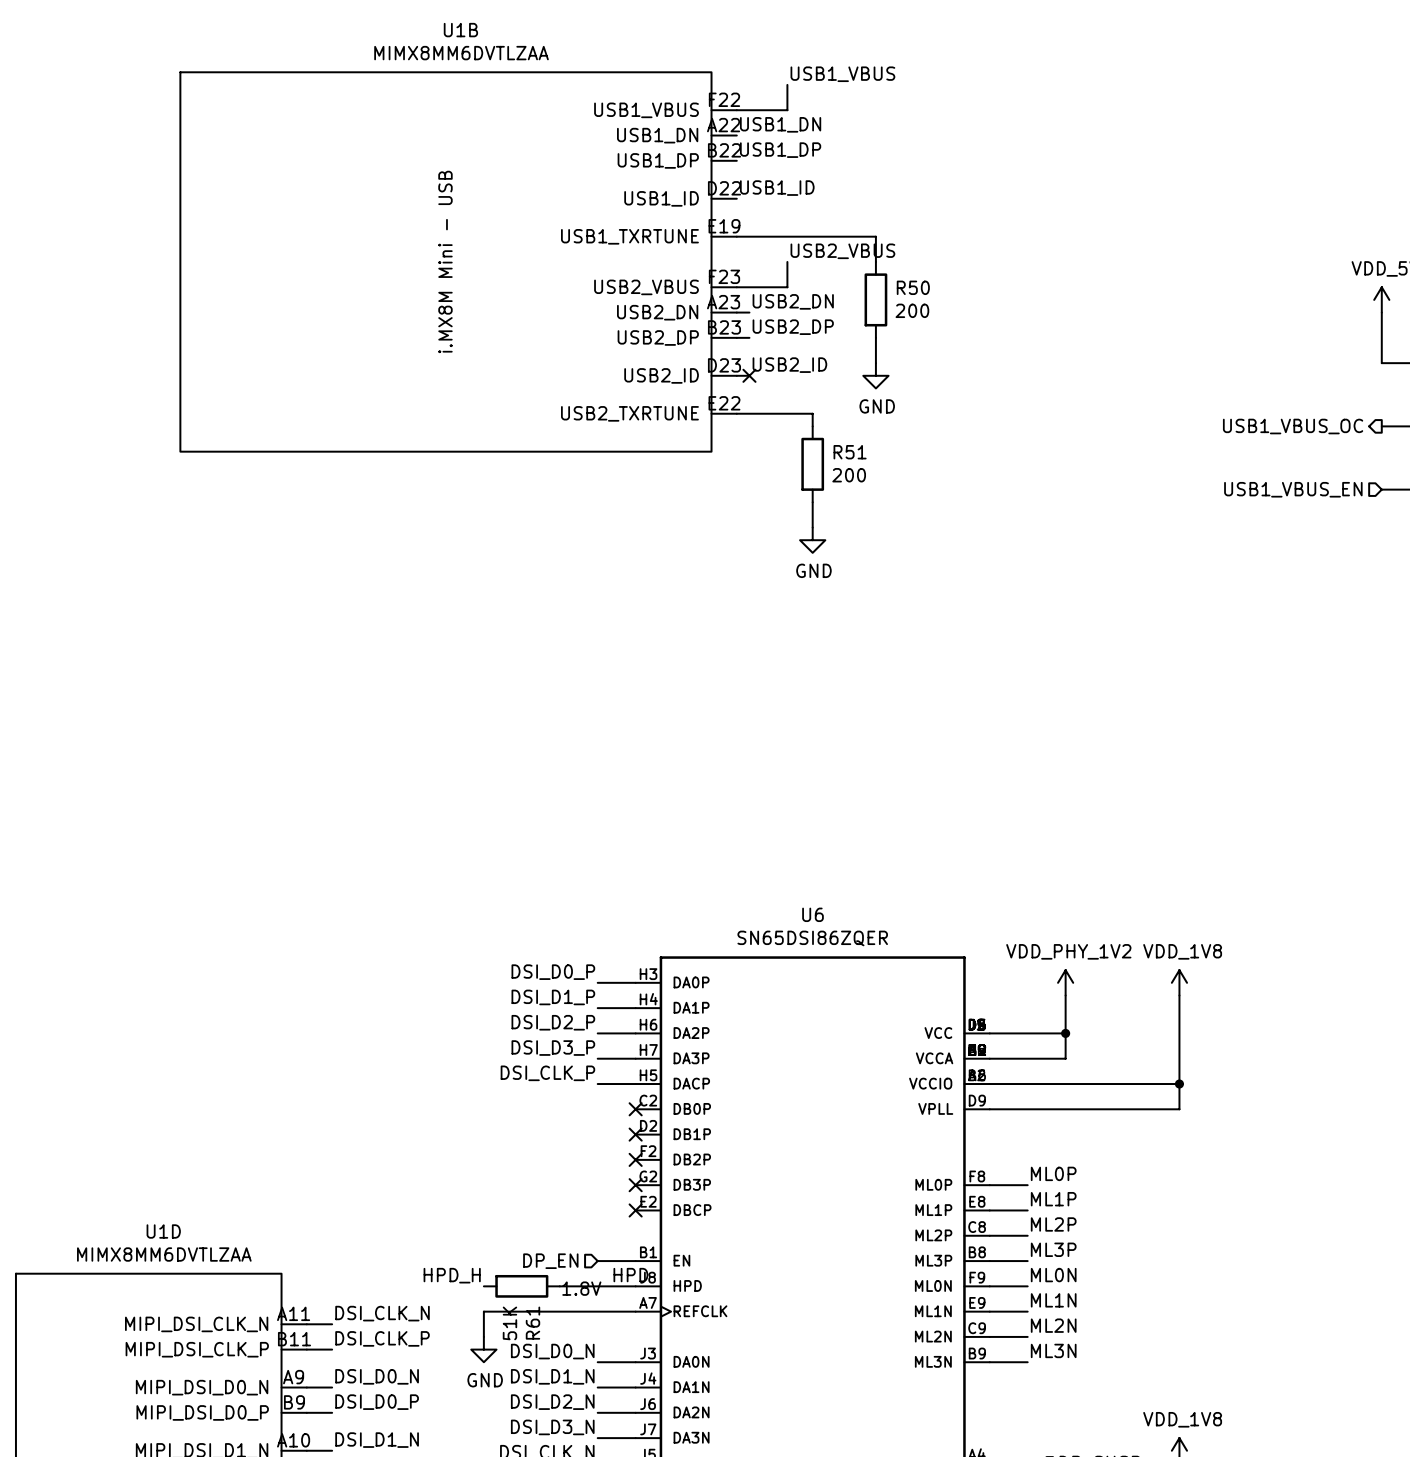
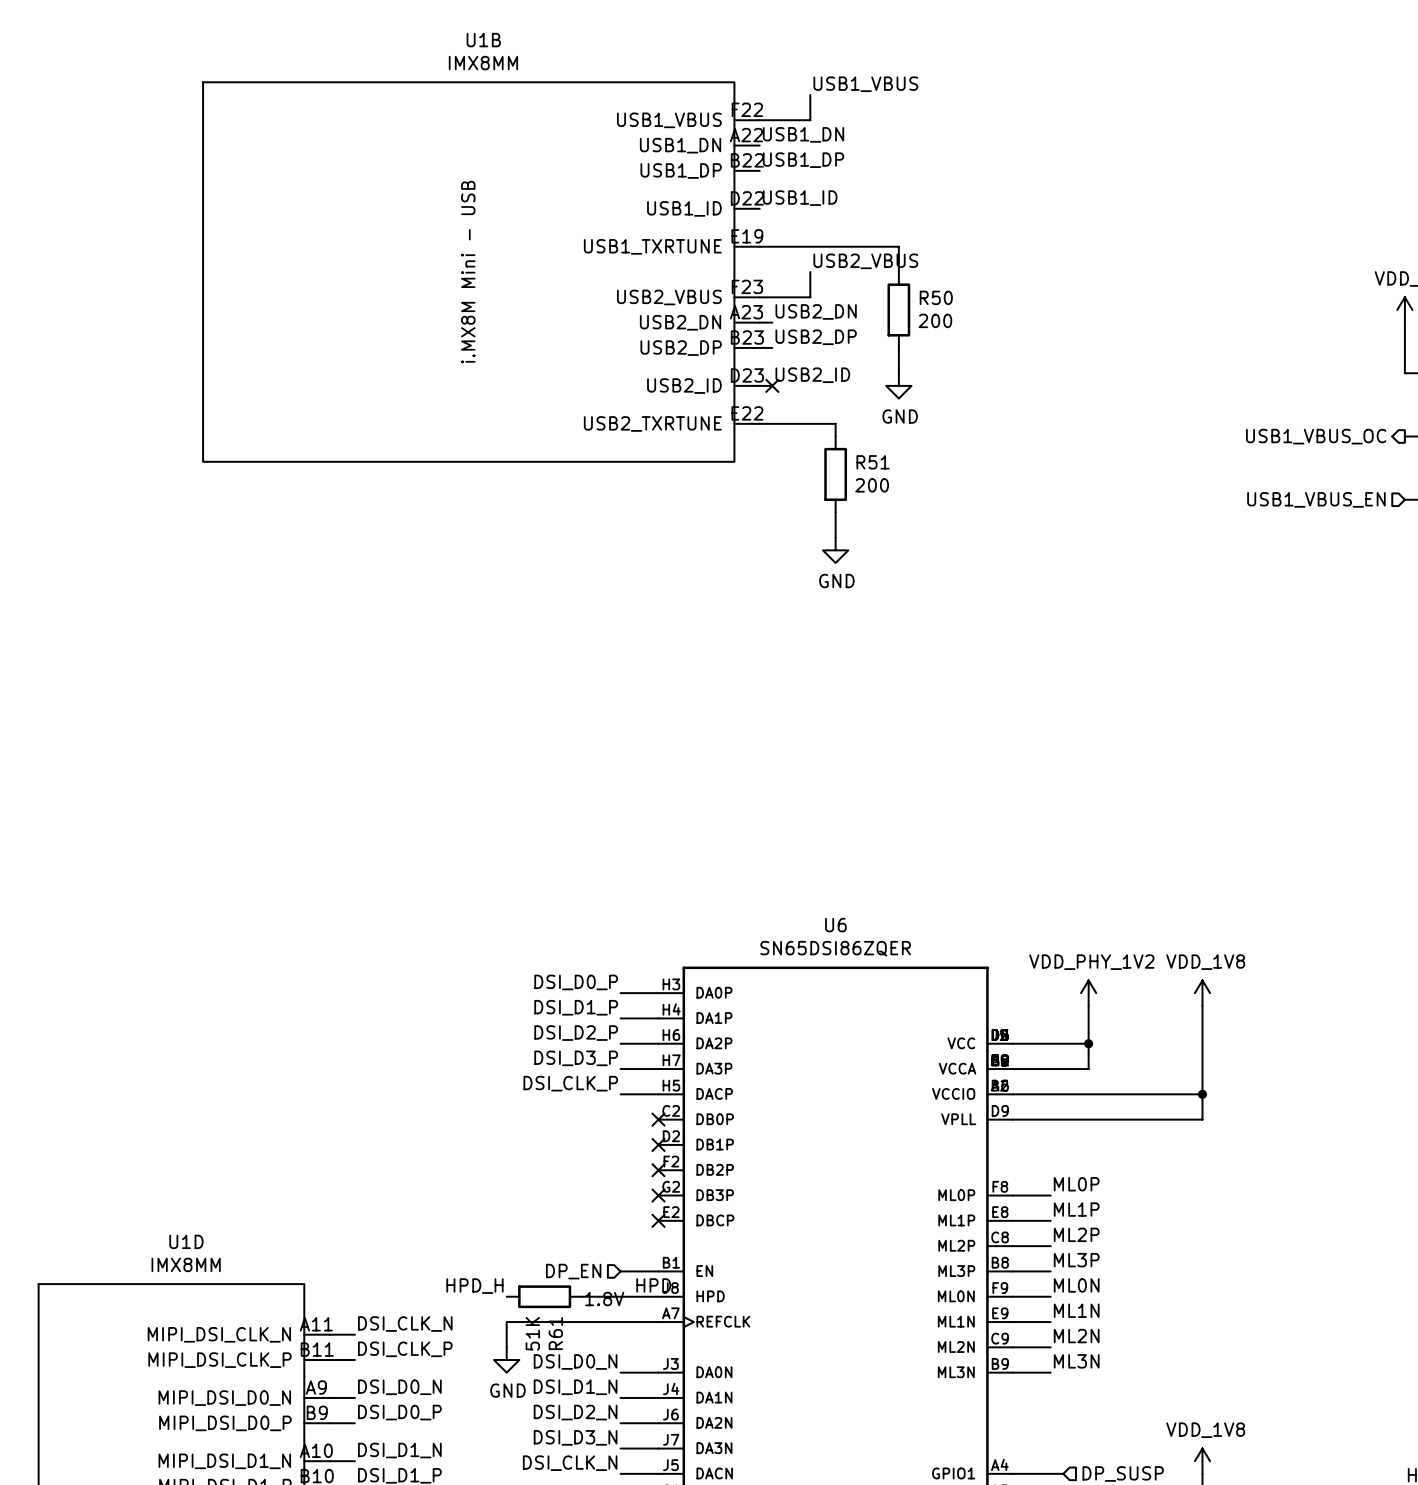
U1B value: MIMX8MM6DVTLZAA (461, 53) -> IMX8MM (483, 63)
U1D value: MIMX8MM6DVTLZAA (164, 1254) -> IMX8MM (186, 1264)

